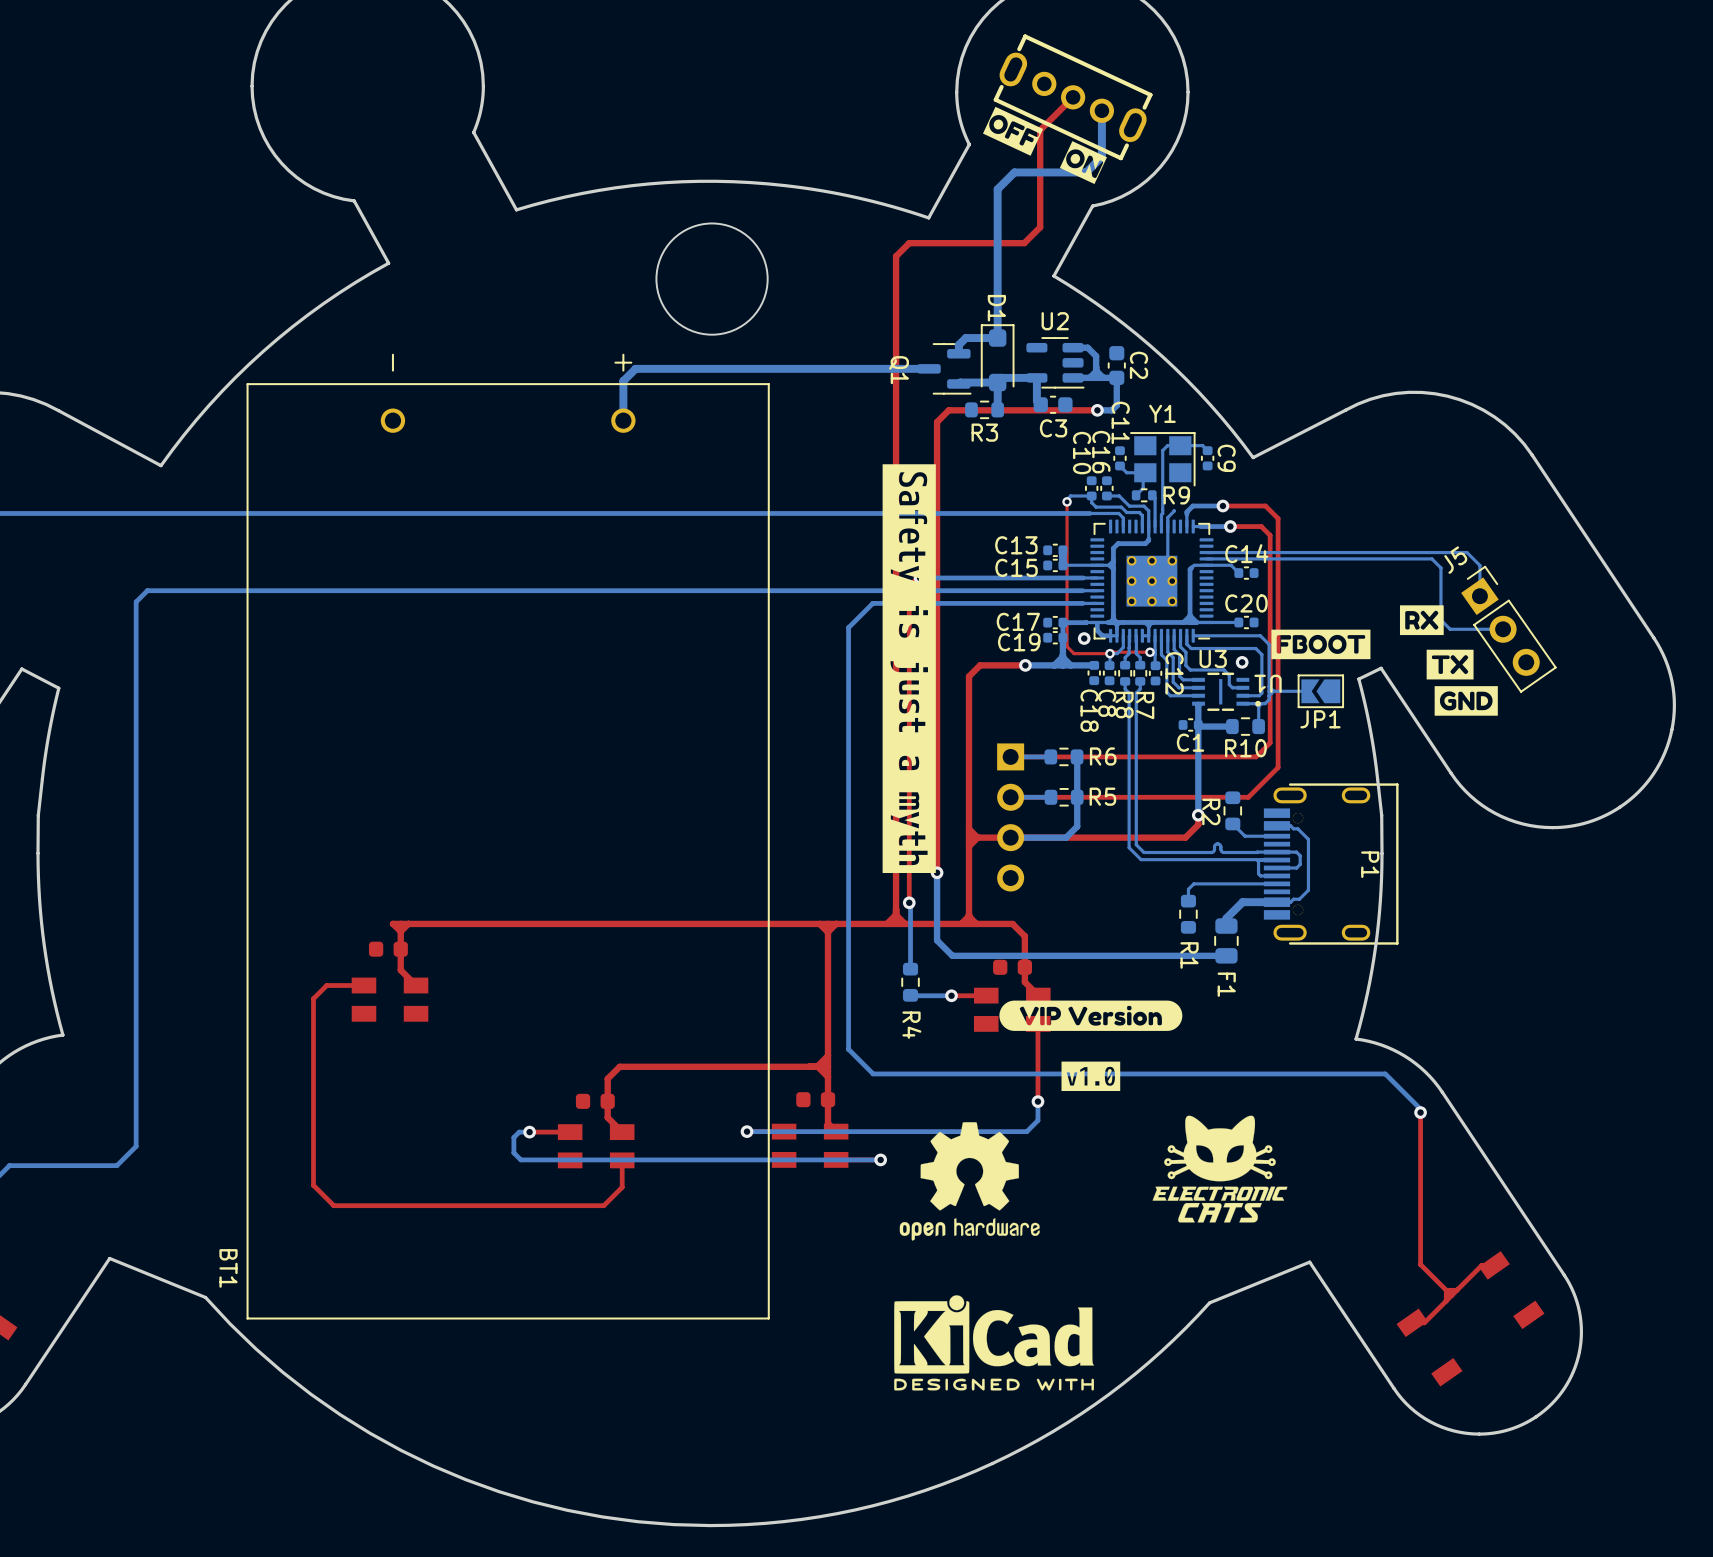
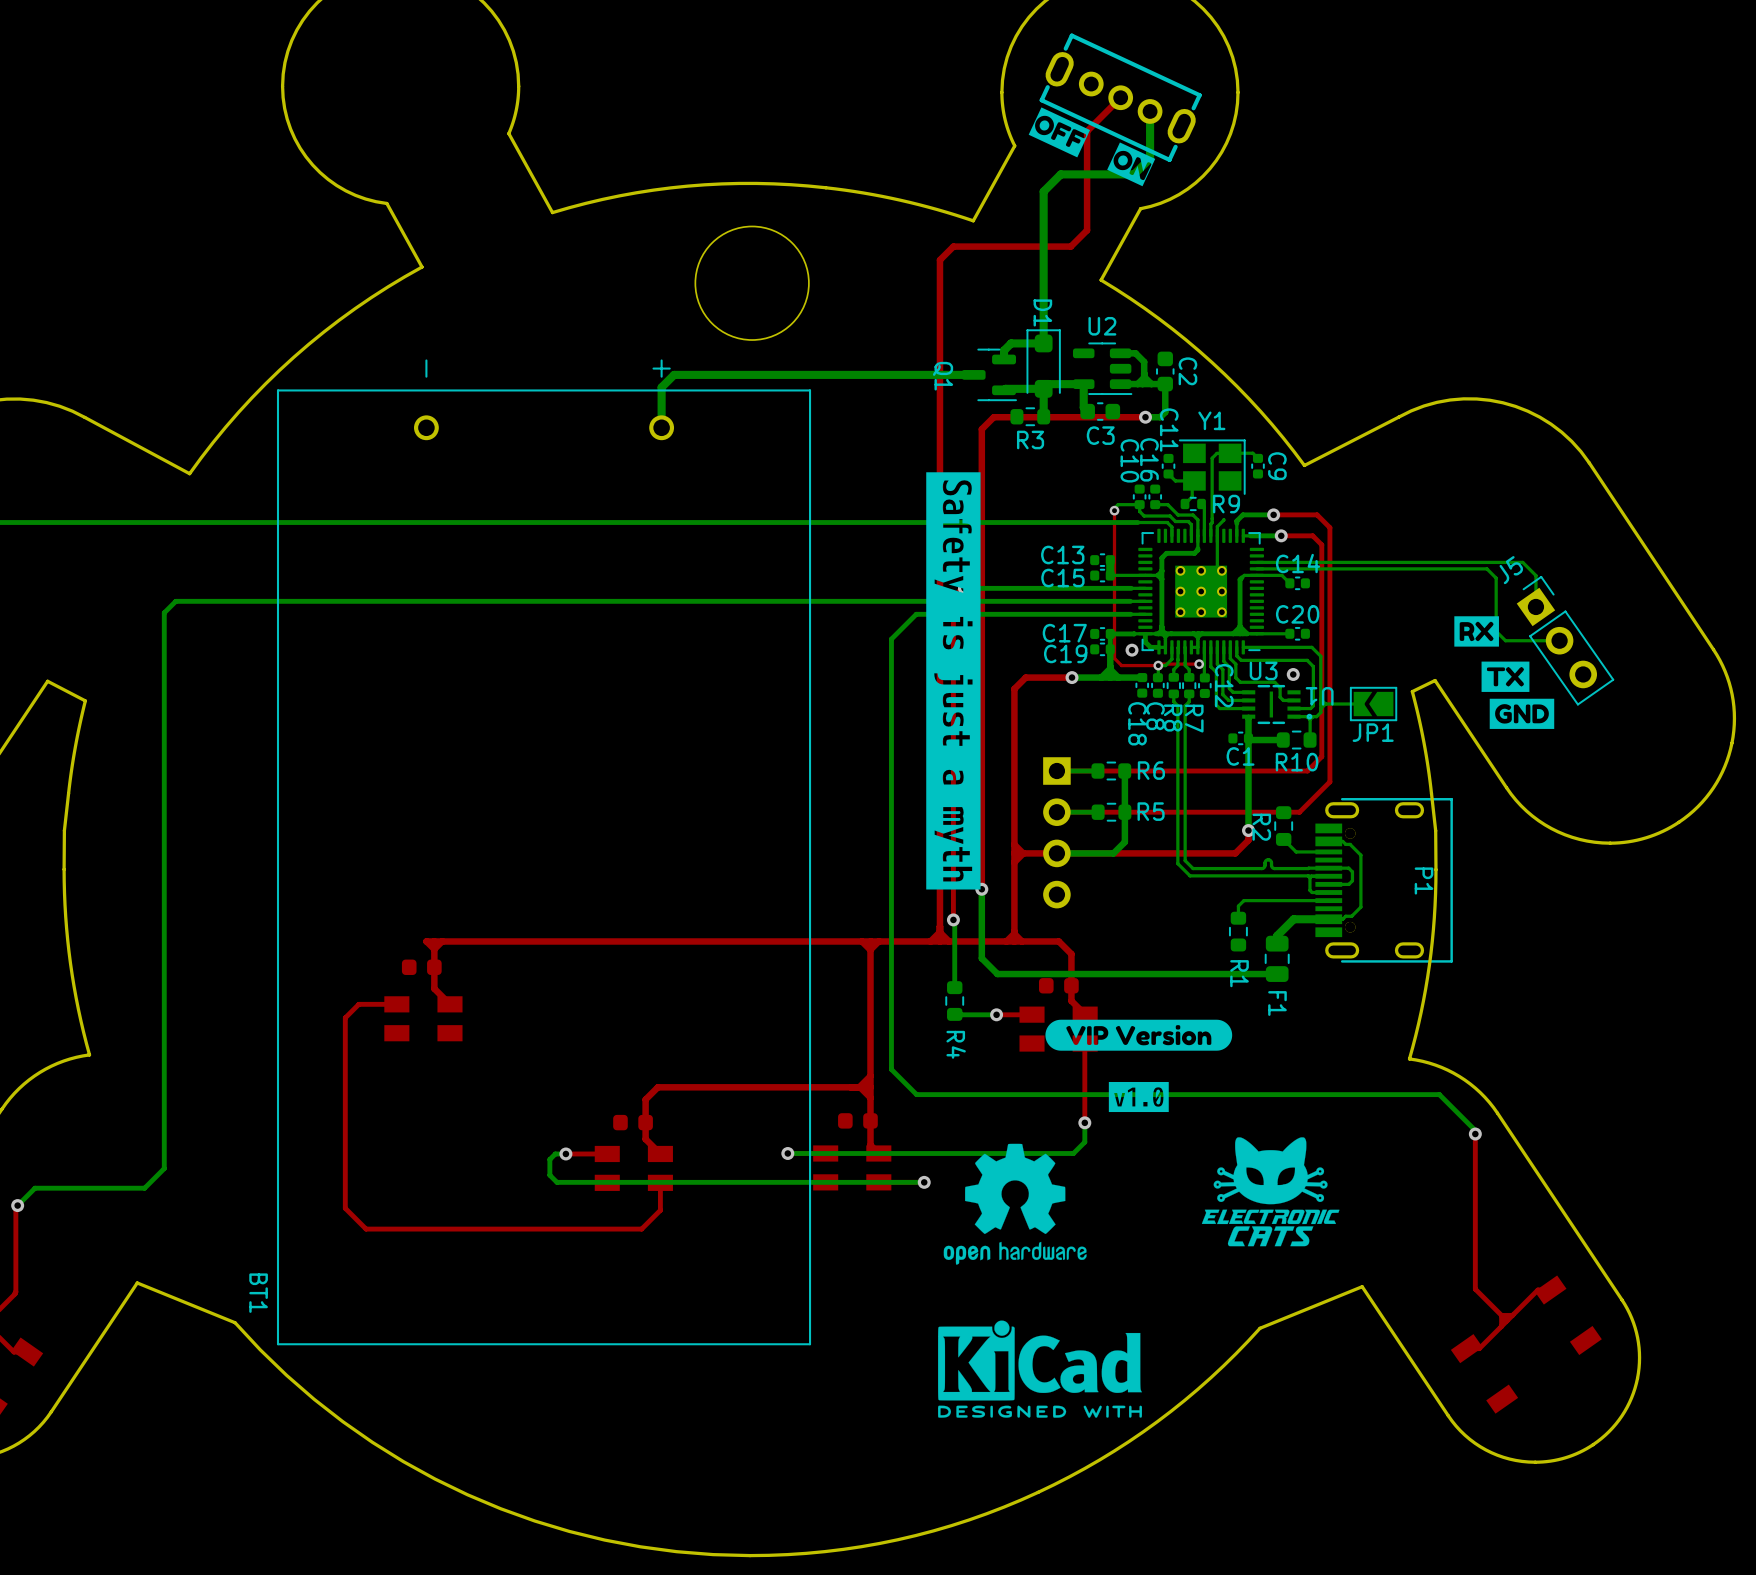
drawing: [1271, 629, 1371, 660] -> none

